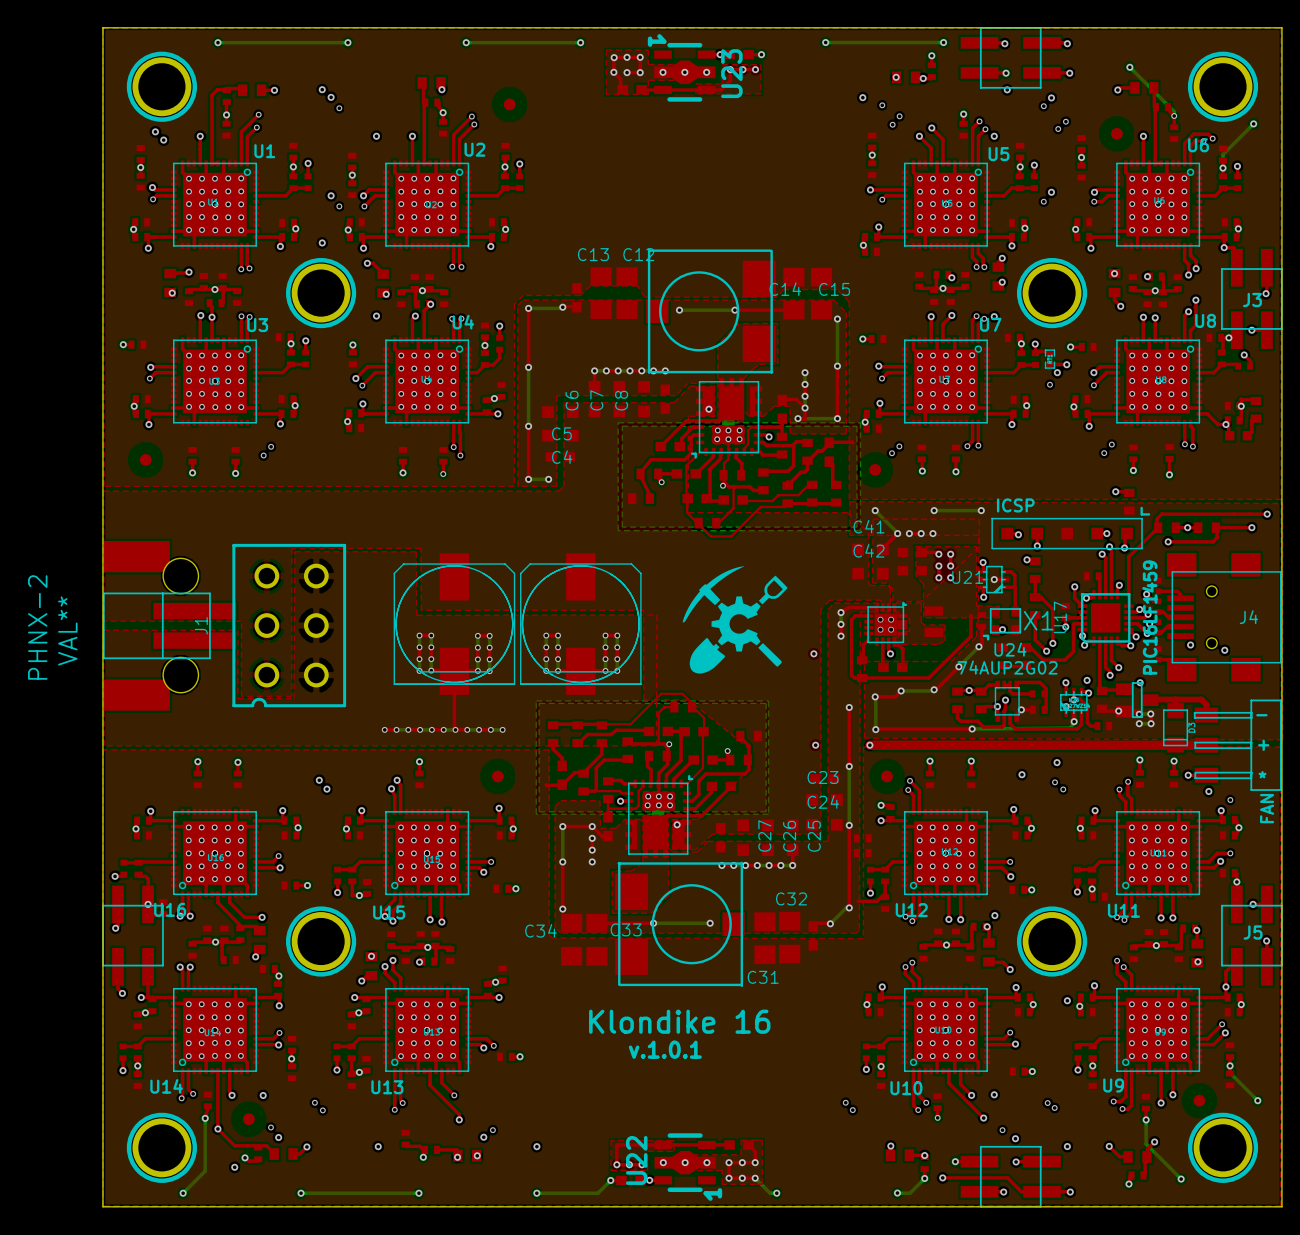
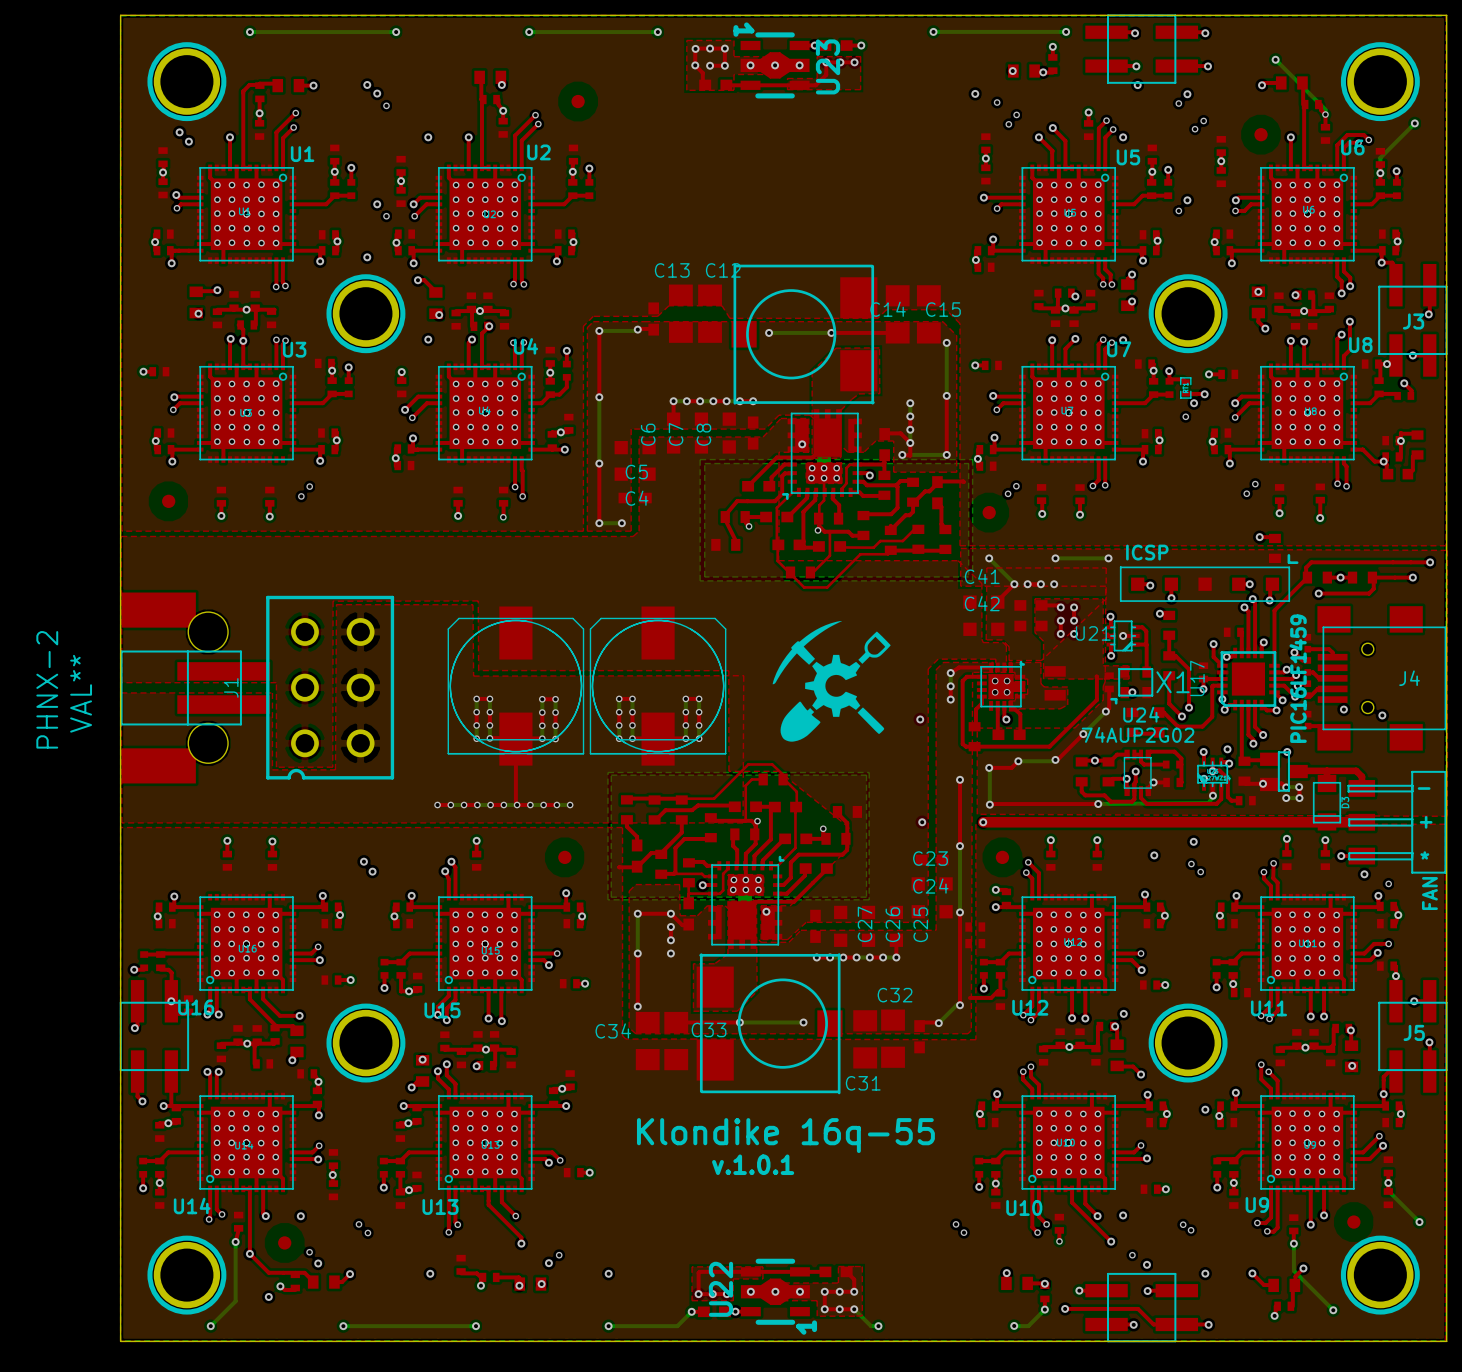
text: Klondike 16 (679, 1021) -> Klondike 16q-55 (785, 1135)

